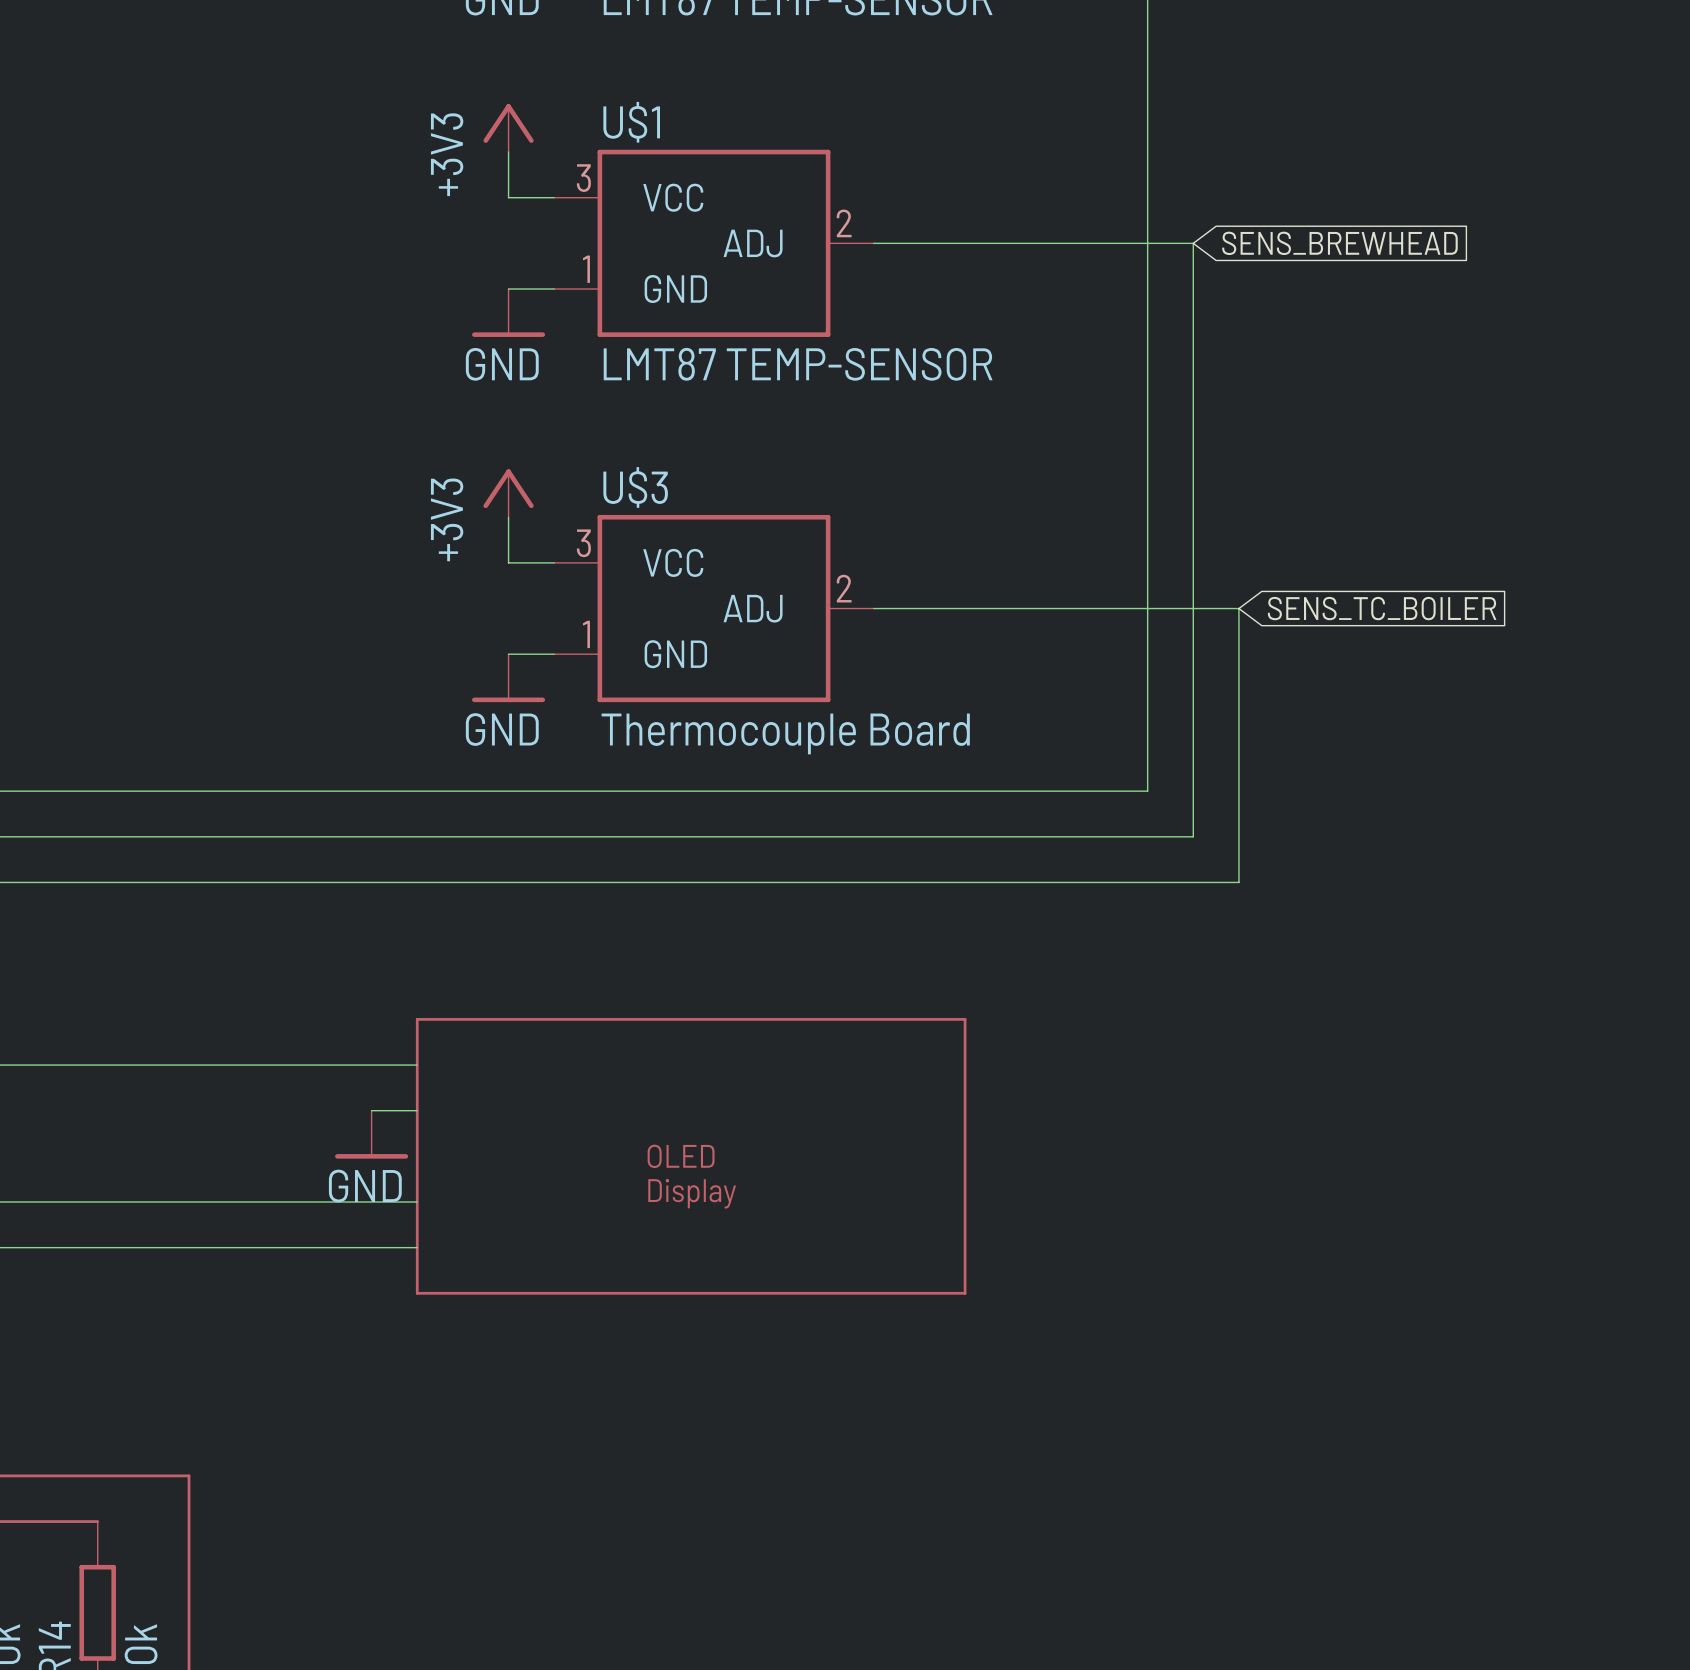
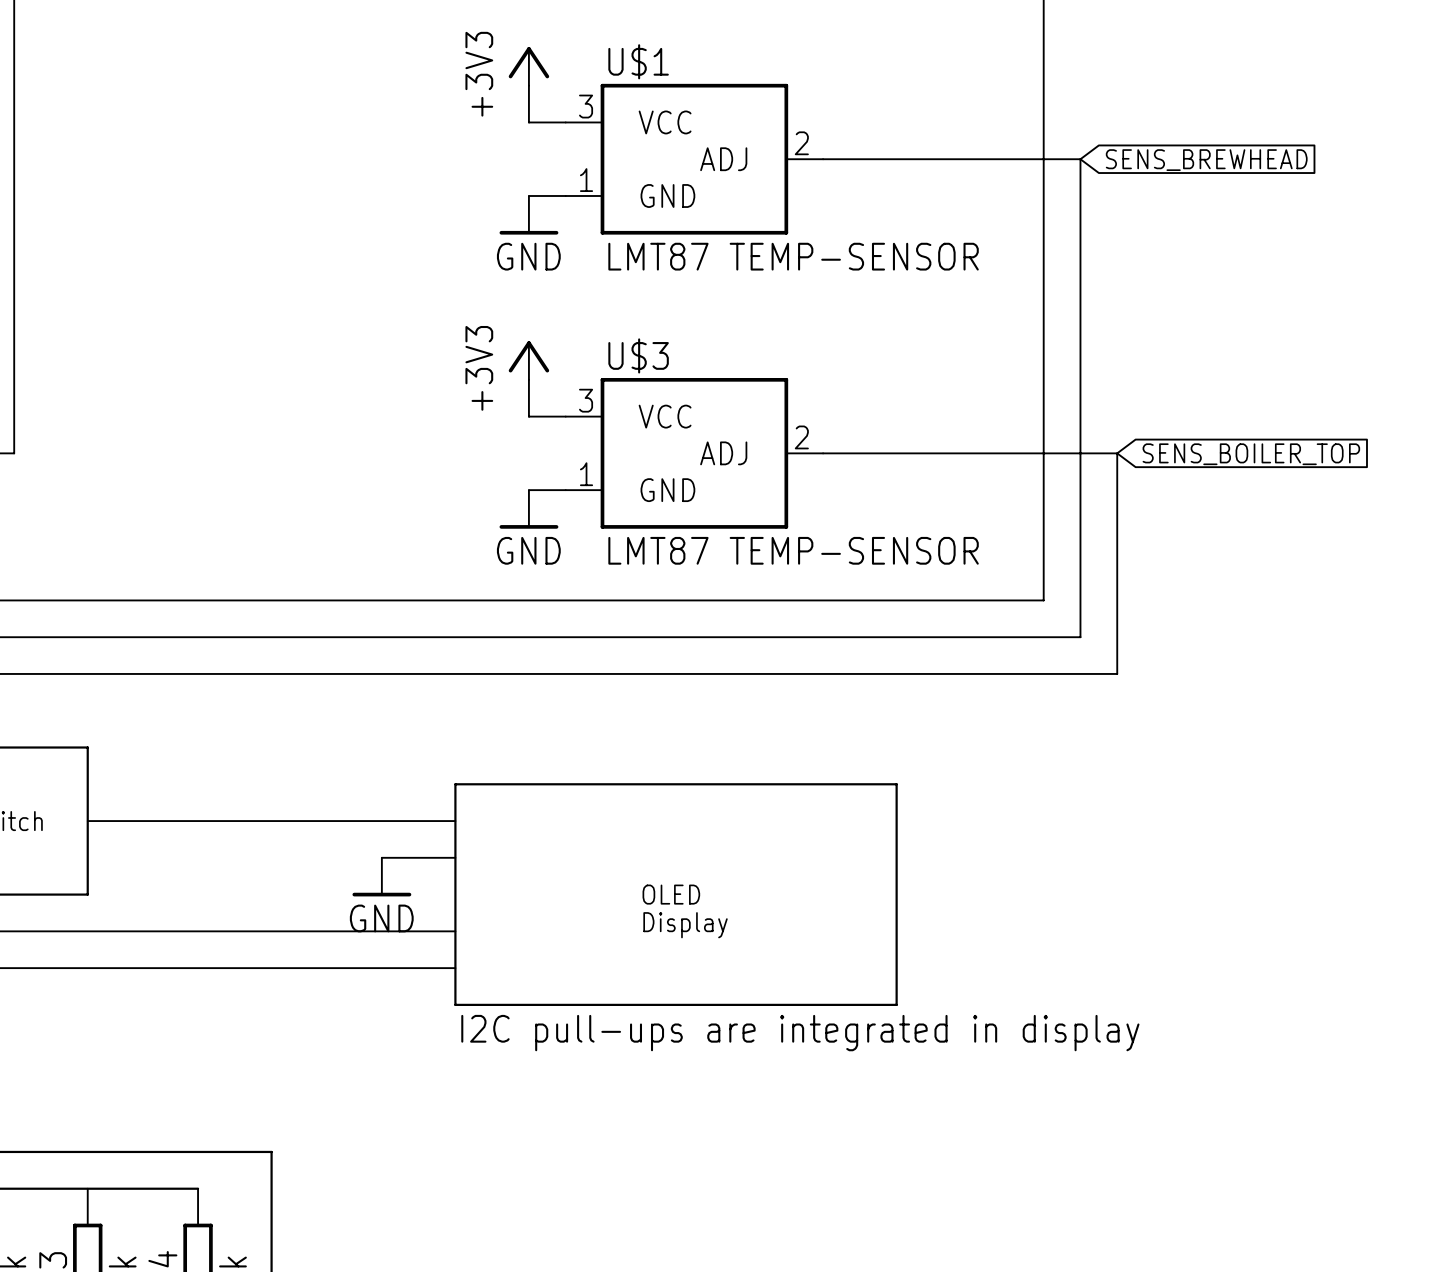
global label: SENS_TC_BOILER (1382, 608) -> SENS_BOILER_TOP (1251, 454)
U$3 value: Thermocouple Board (785, 733) -> LMT87 TEMP-SENSOR (793, 550)
wire: none -> (381, 857) (418, 857)
power symbol position: GND (371, 1134) -> GND (381, 877)
text: none -> I2C pull-ups are integrated in display (800, 1033)

